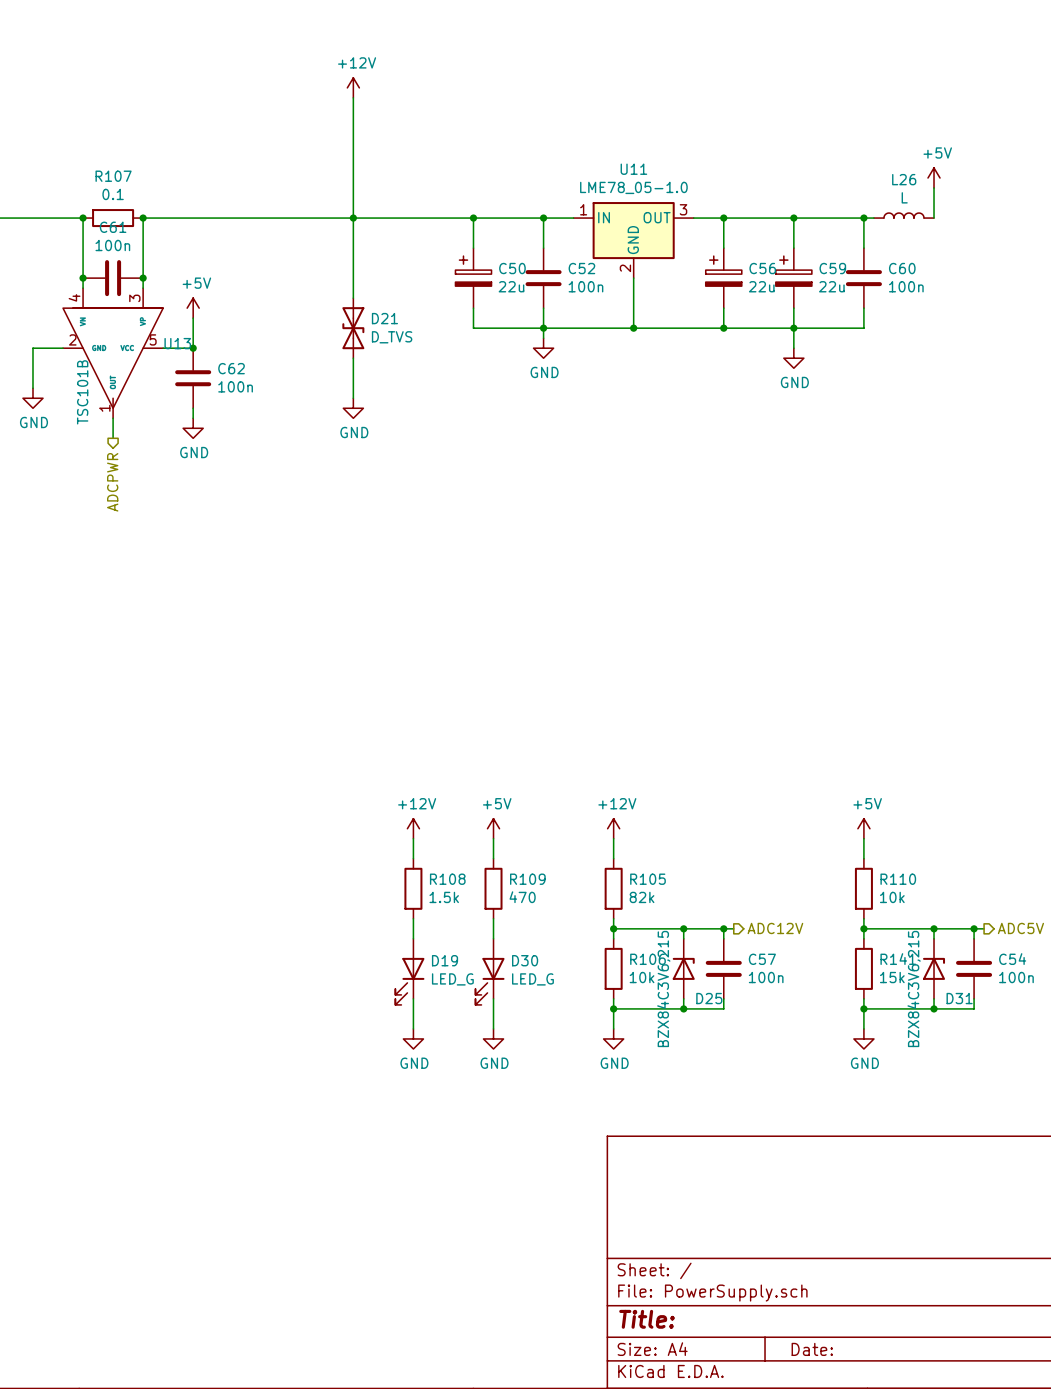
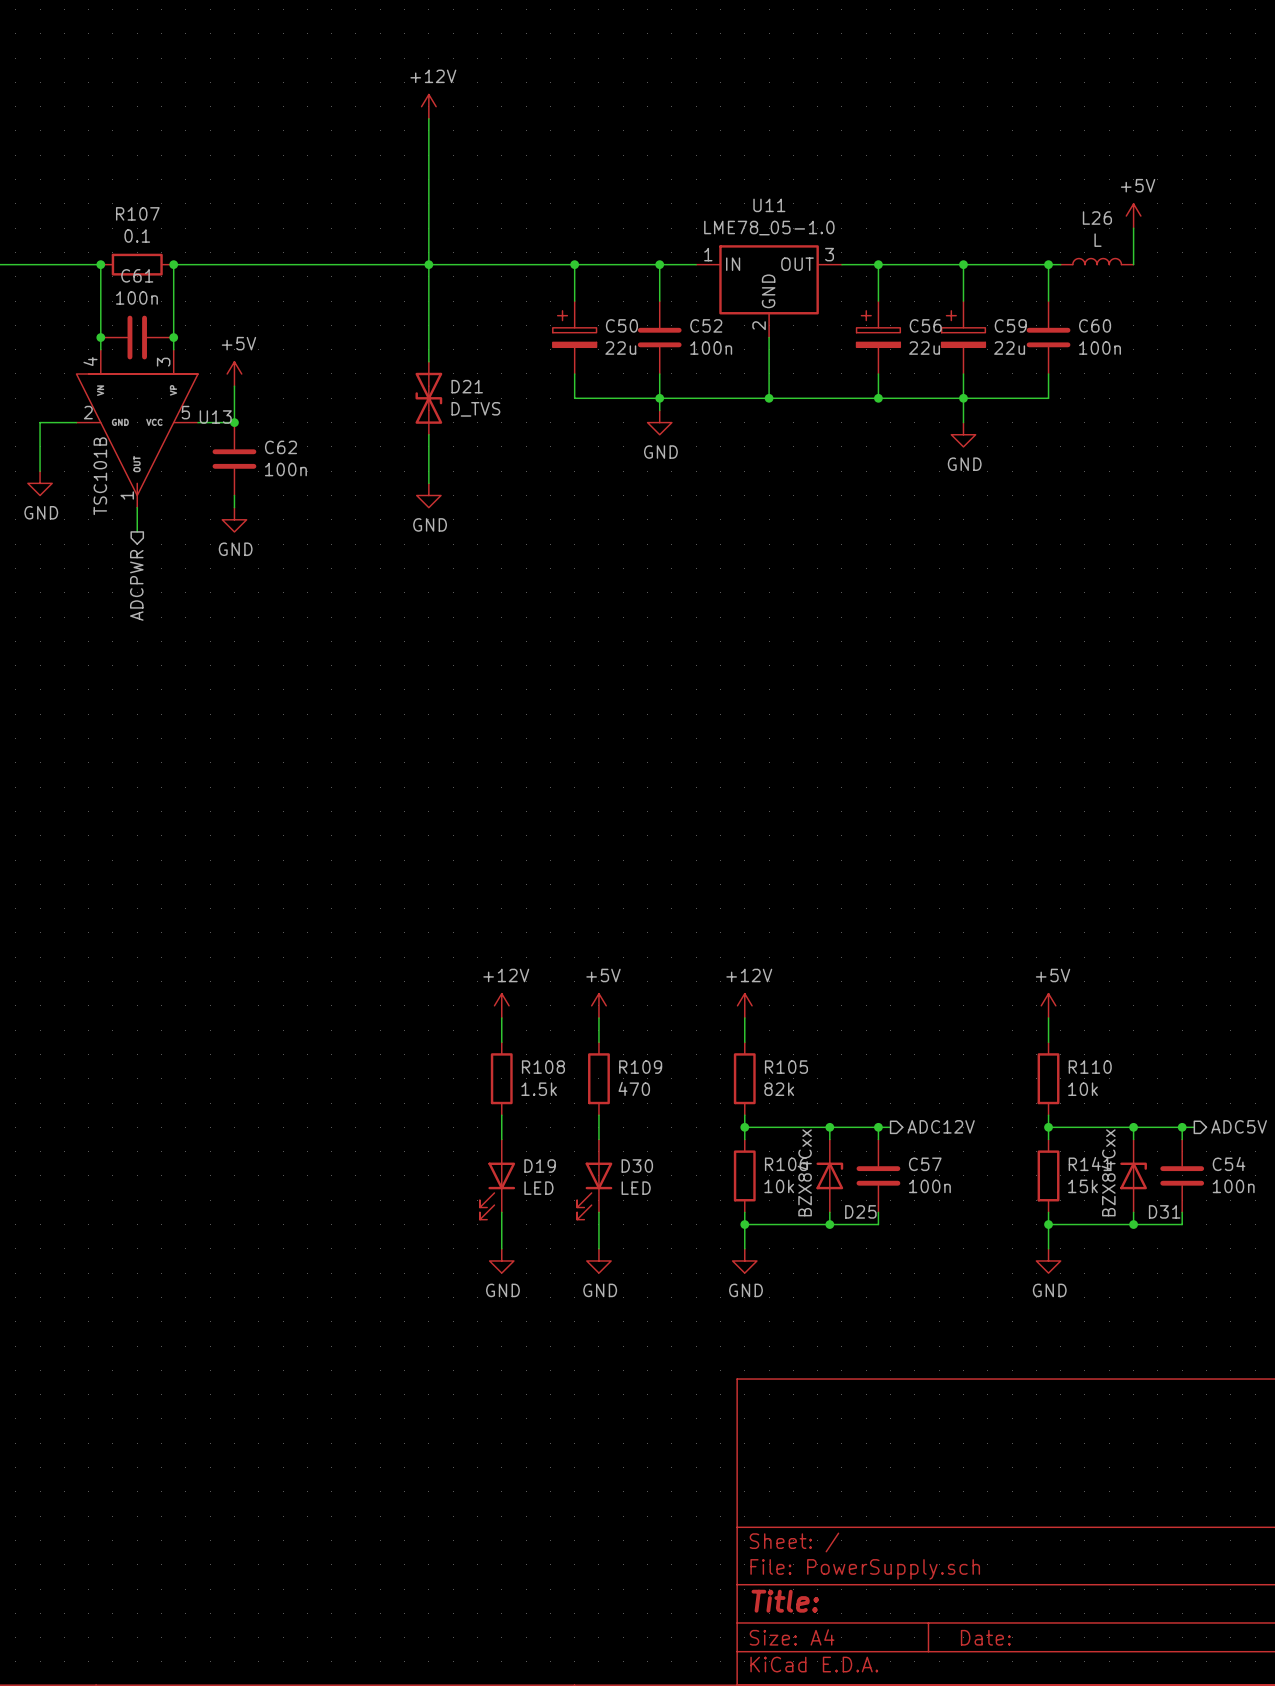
D19 value: LED_G (452, 979) -> LED (538, 1188)
D30 value: LED_G (532, 979) -> LED (636, 1188)
D25 value: BZX84C3V6,215 (663, 988) -> BZX84Cxx (804, 1172)
D31 value: BZX84C3V6,215 (914, 988) -> BZX84Cxx (1108, 1172)

